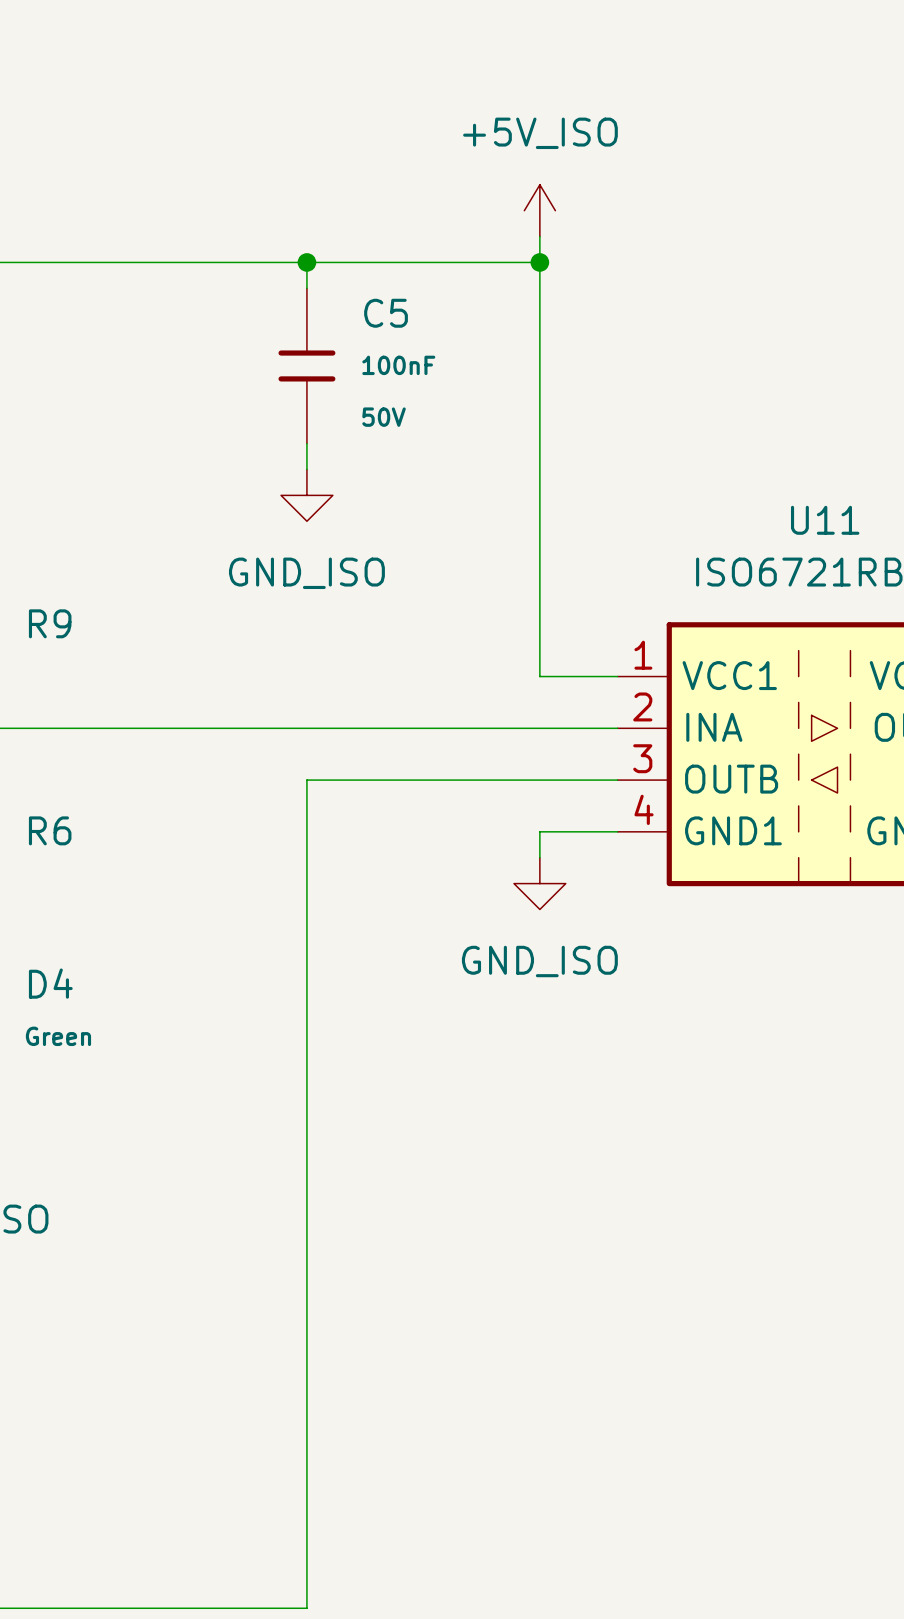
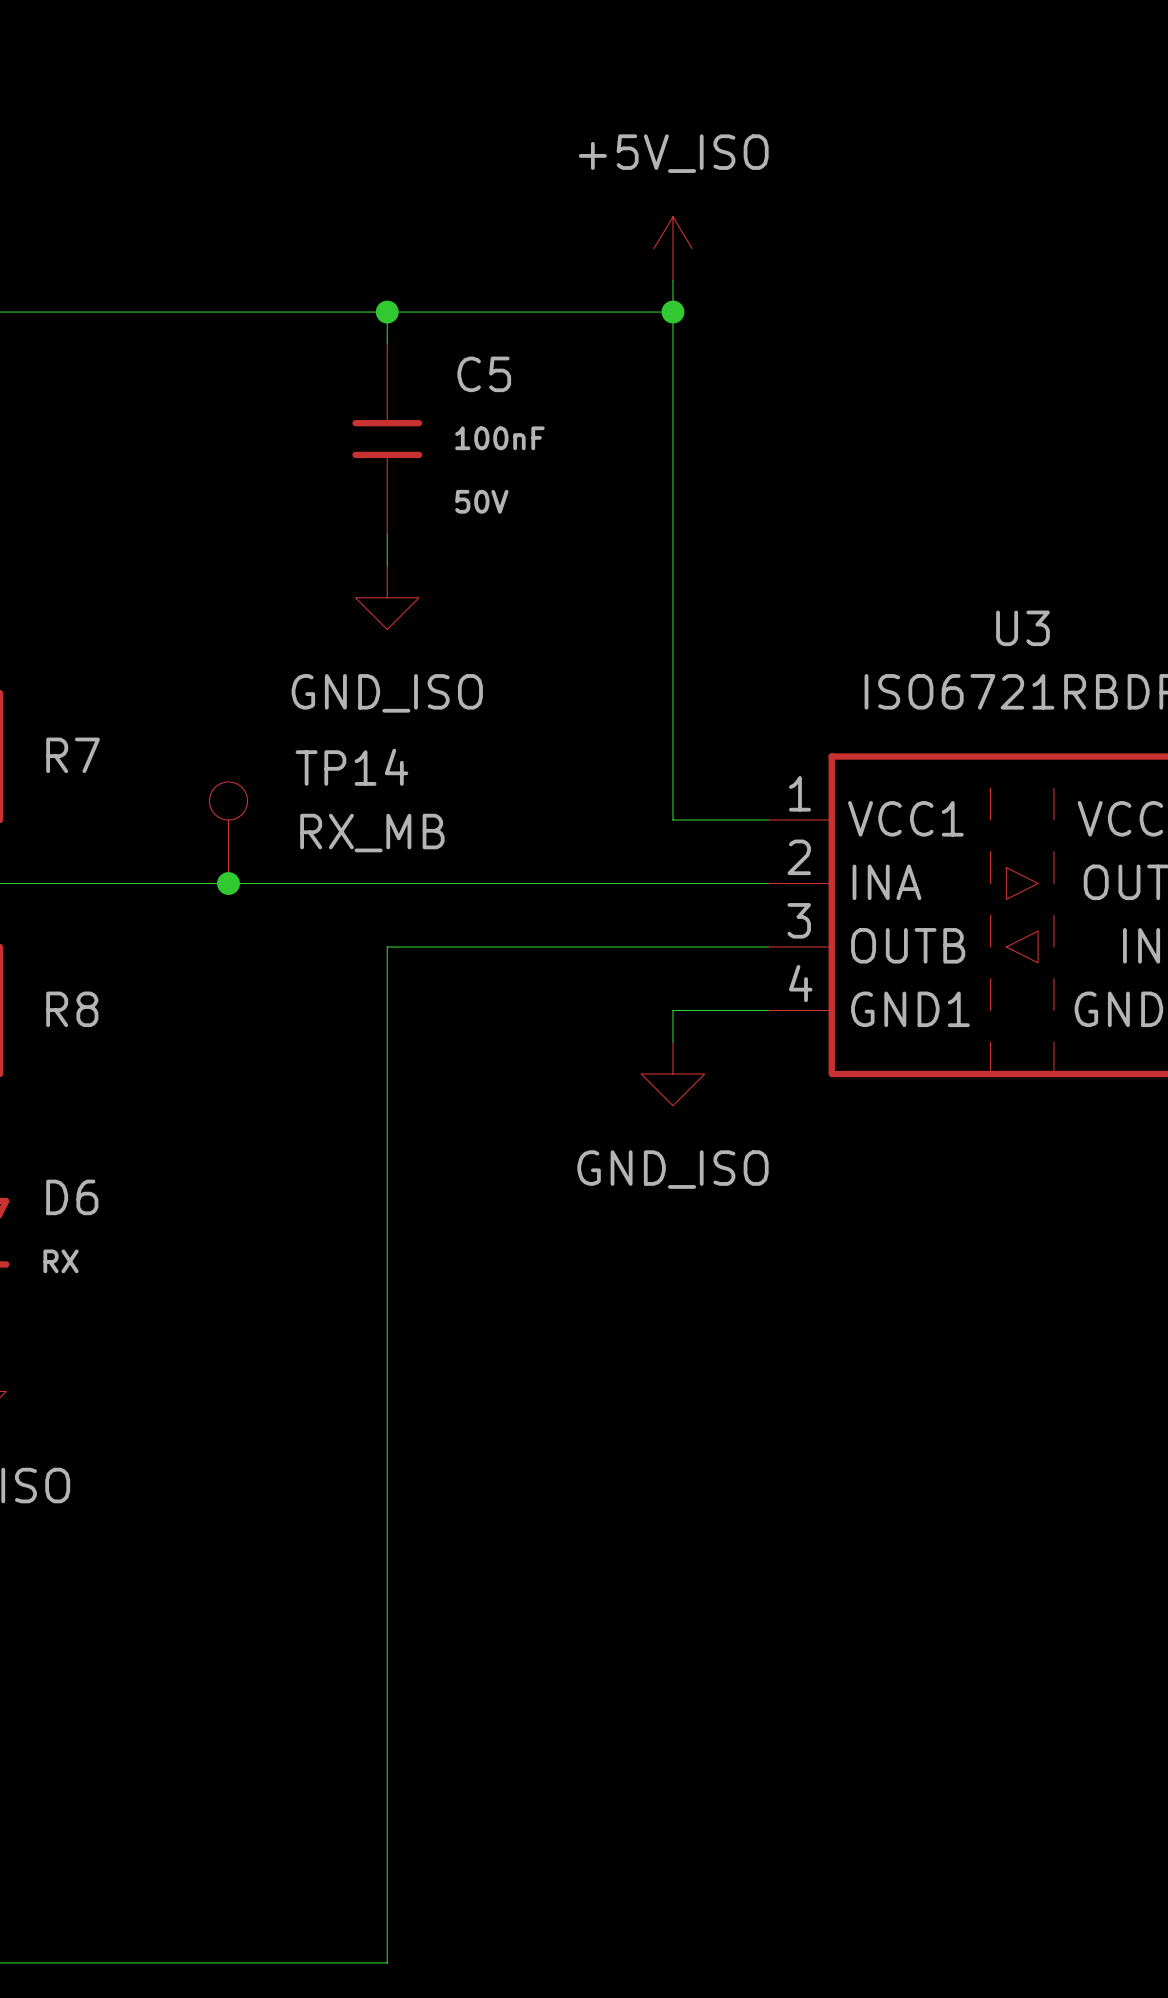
U11 name: U11 (825, 520) -> U3 (1022, 628)
R9 name: R9 (50, 623) -> R7 (73, 755)
TP14: none -> RX_MB (228, 832)
junction: none -> (228, 883)
R6 name: R6 (50, 830) -> R8 (72, 1009)
D4 name: D4 (50, 983) -> D6 (72, 1197)
D4 value: Green (58, 1036) -> RX (61, 1261)

